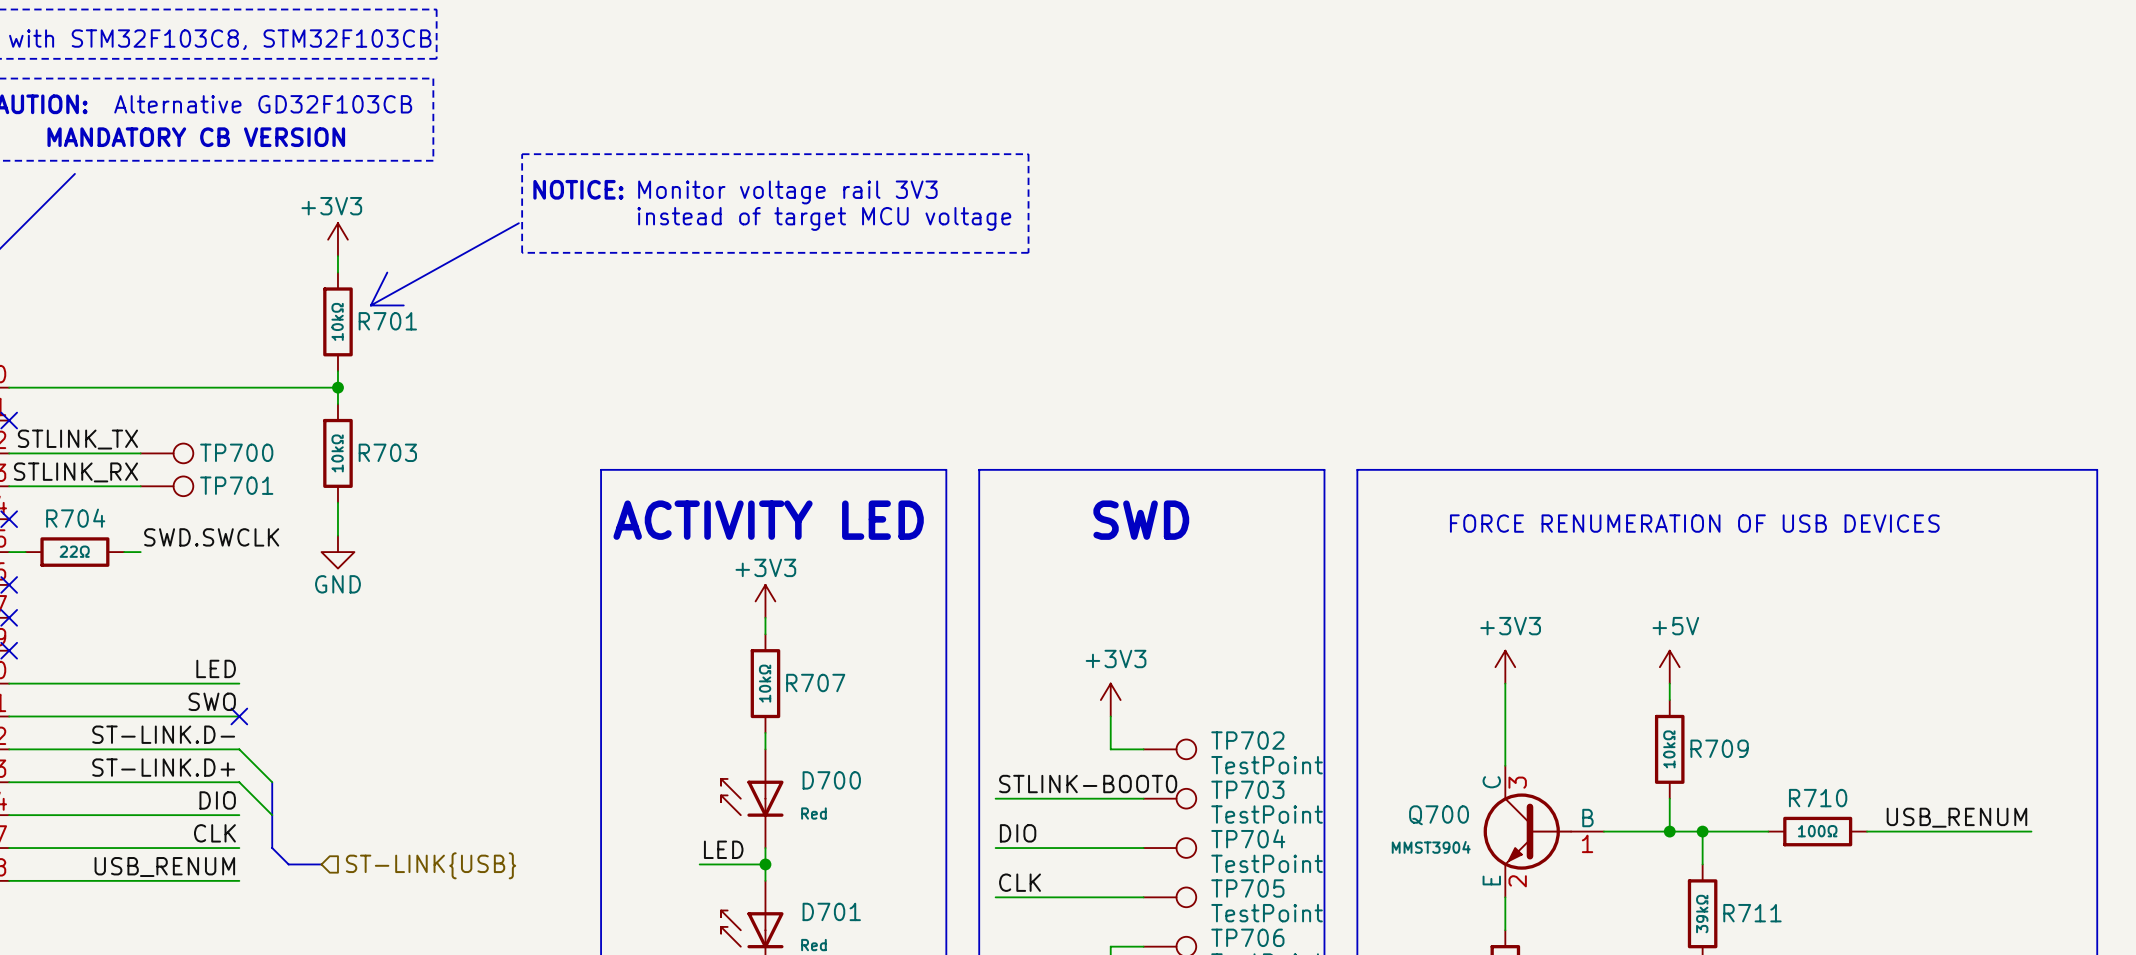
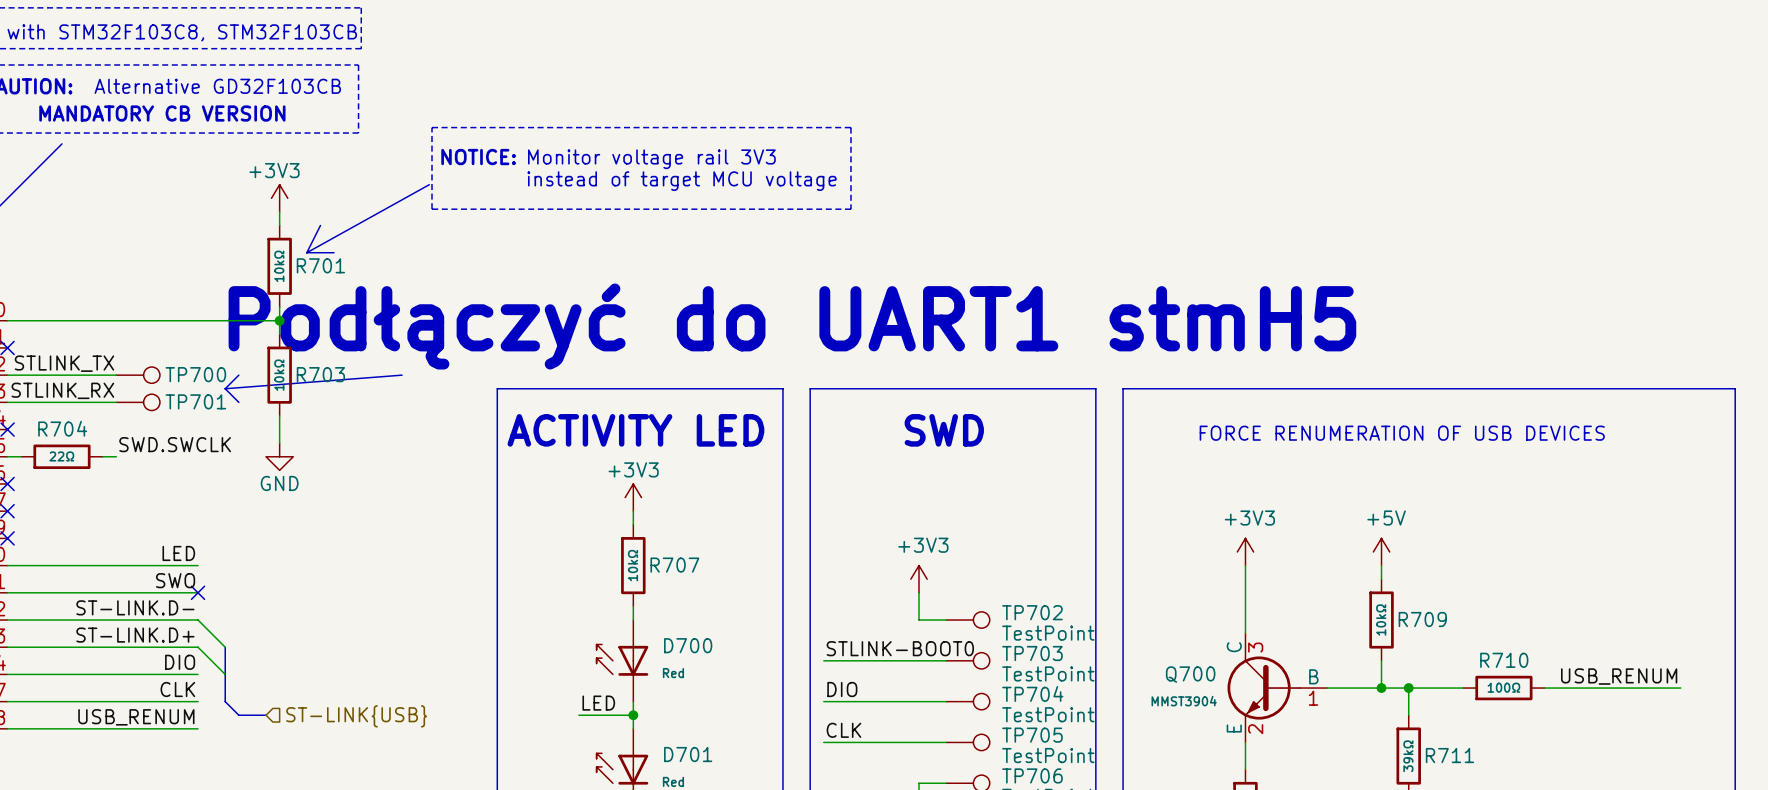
text: none -> Podłączyć do UART1 stmH5 (792, 326)
line: none -> (238, 375) (225, 388)
line: none -> (402, 375) (225, 388)
line: none -> (225, 388) (238, 402)

